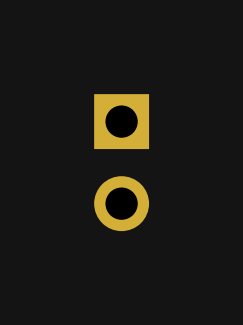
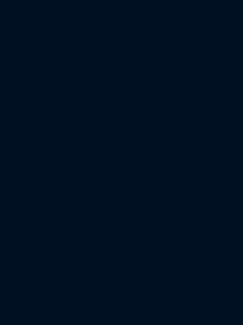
part: (121, 162) -> none

